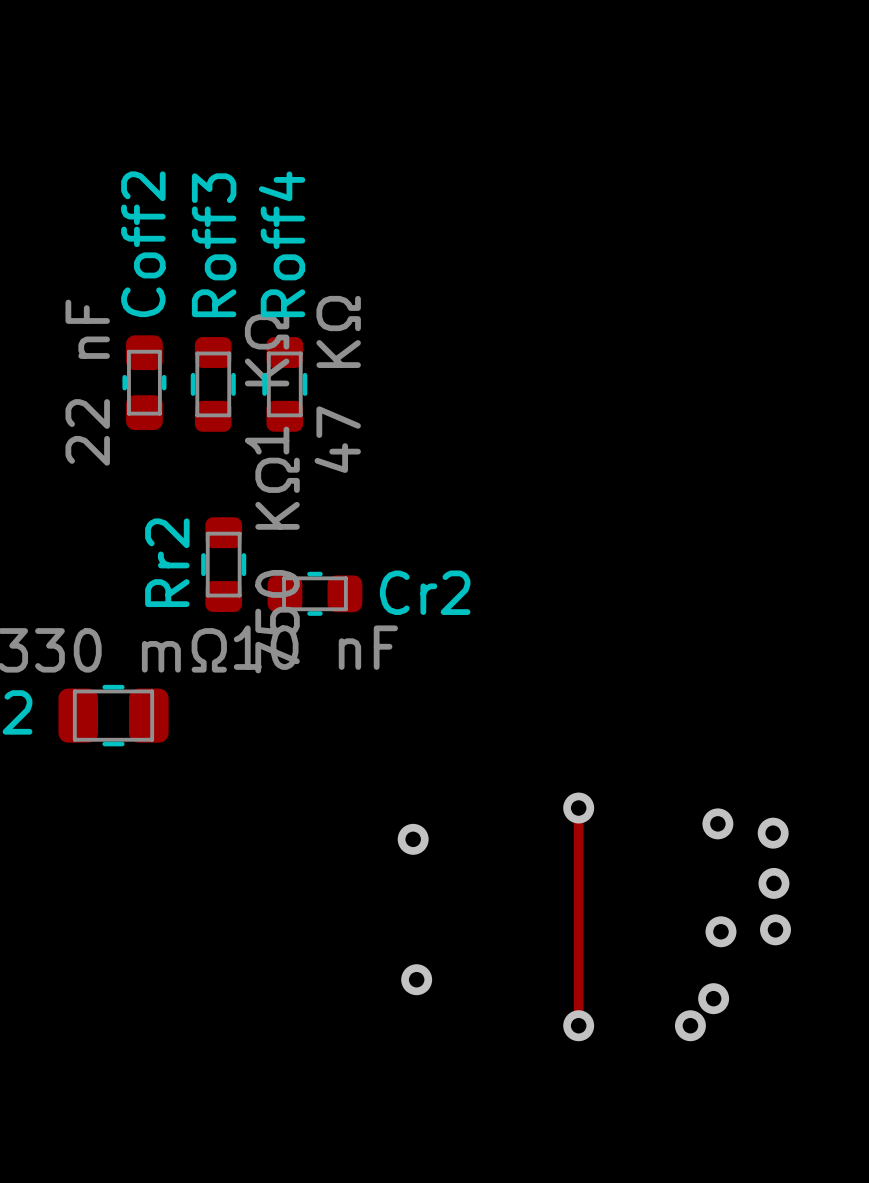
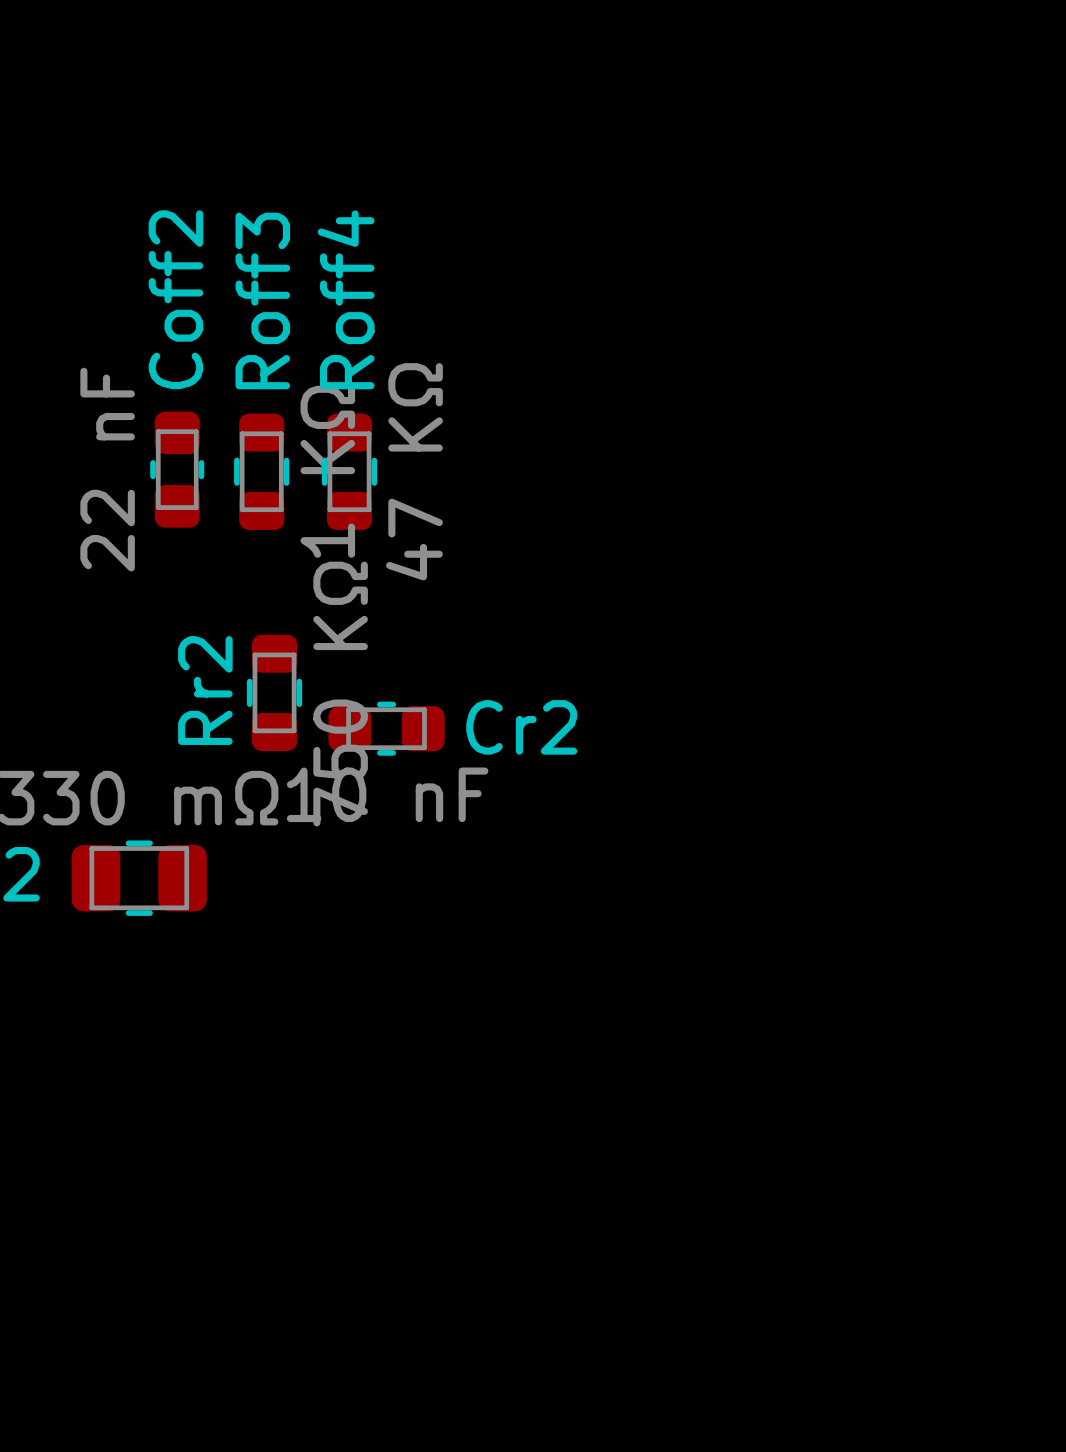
track: (578, 808) (578, 1025) -> none
via: (578, 808) -> none
via: (717, 823) -> none
via: (773, 833) -> none
via: (413, 839) -> none
via: (773, 883) -> none
via: (775, 929) -> none
via: (720, 931) -> none
via: (416, 979) -> none
via: (713, 998) -> none
via: (578, 1025) -> none
via: (690, 1025) -> none

